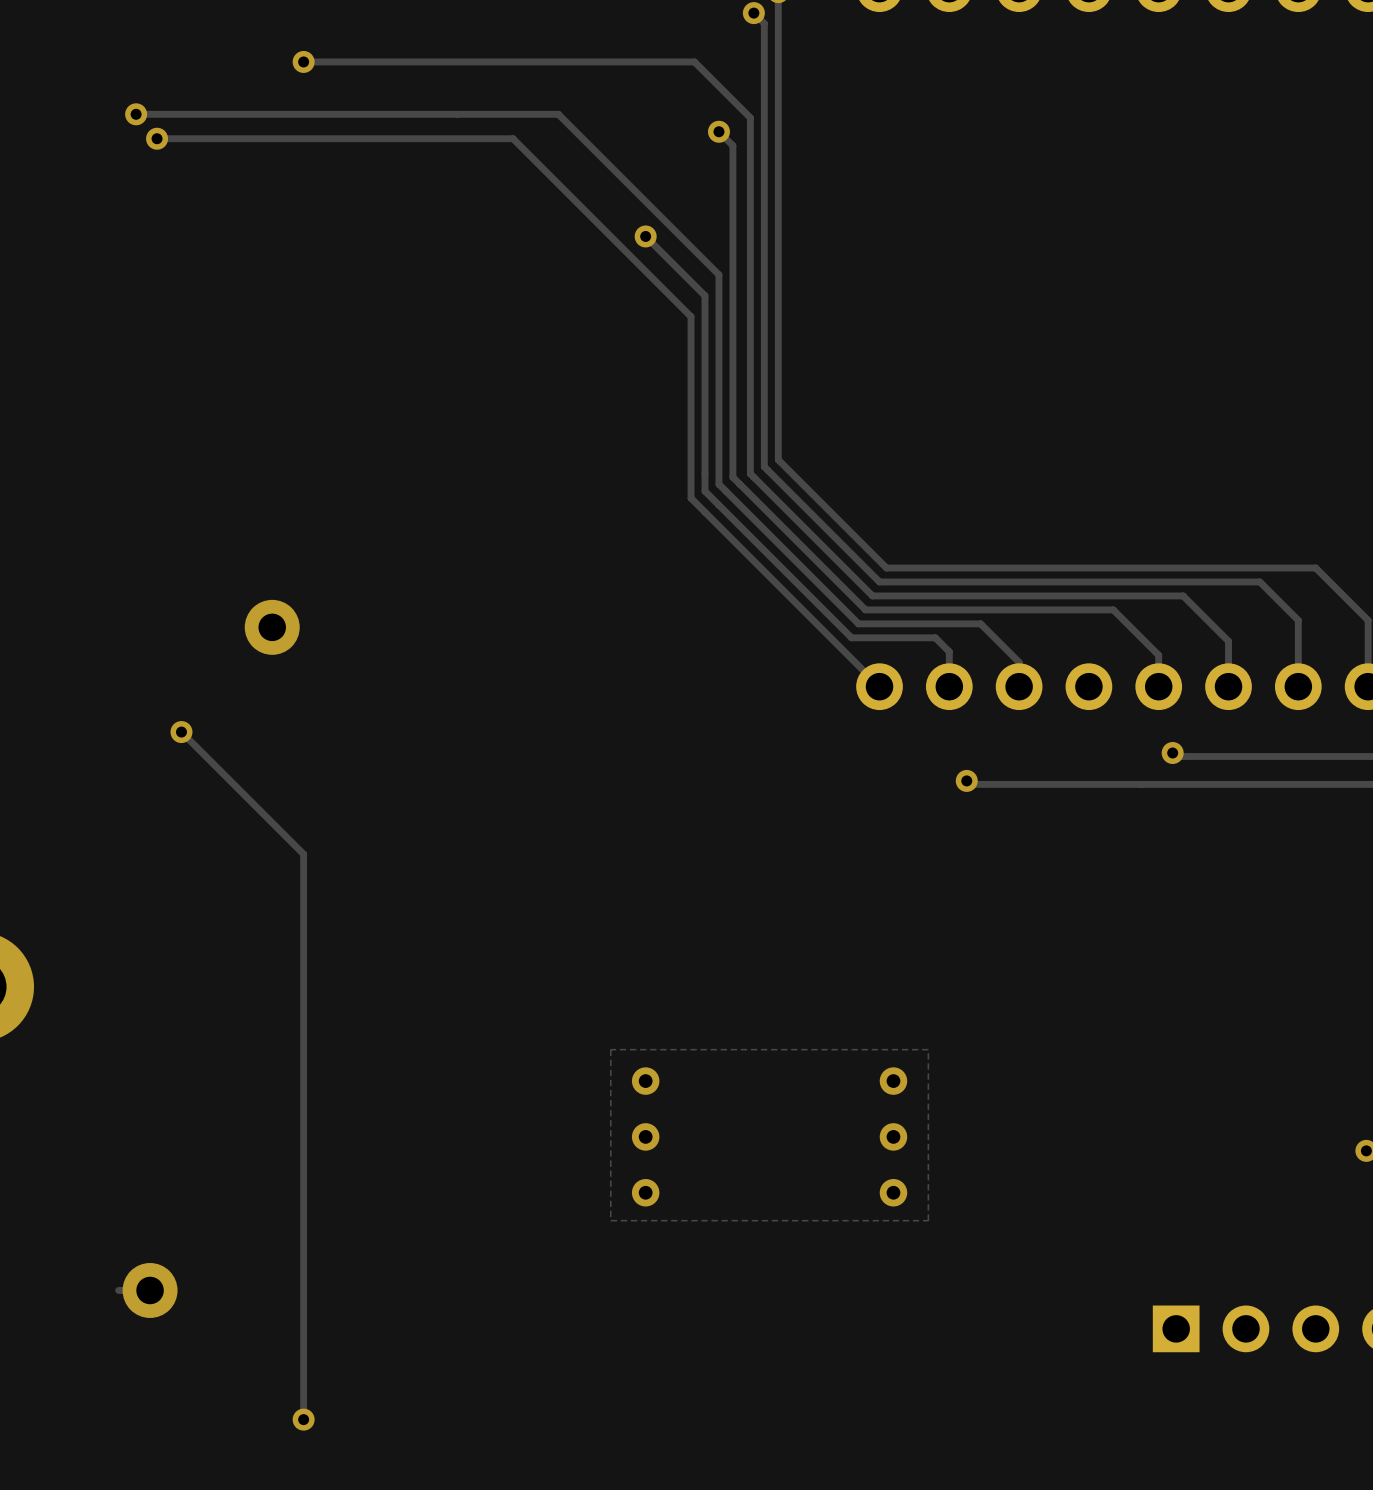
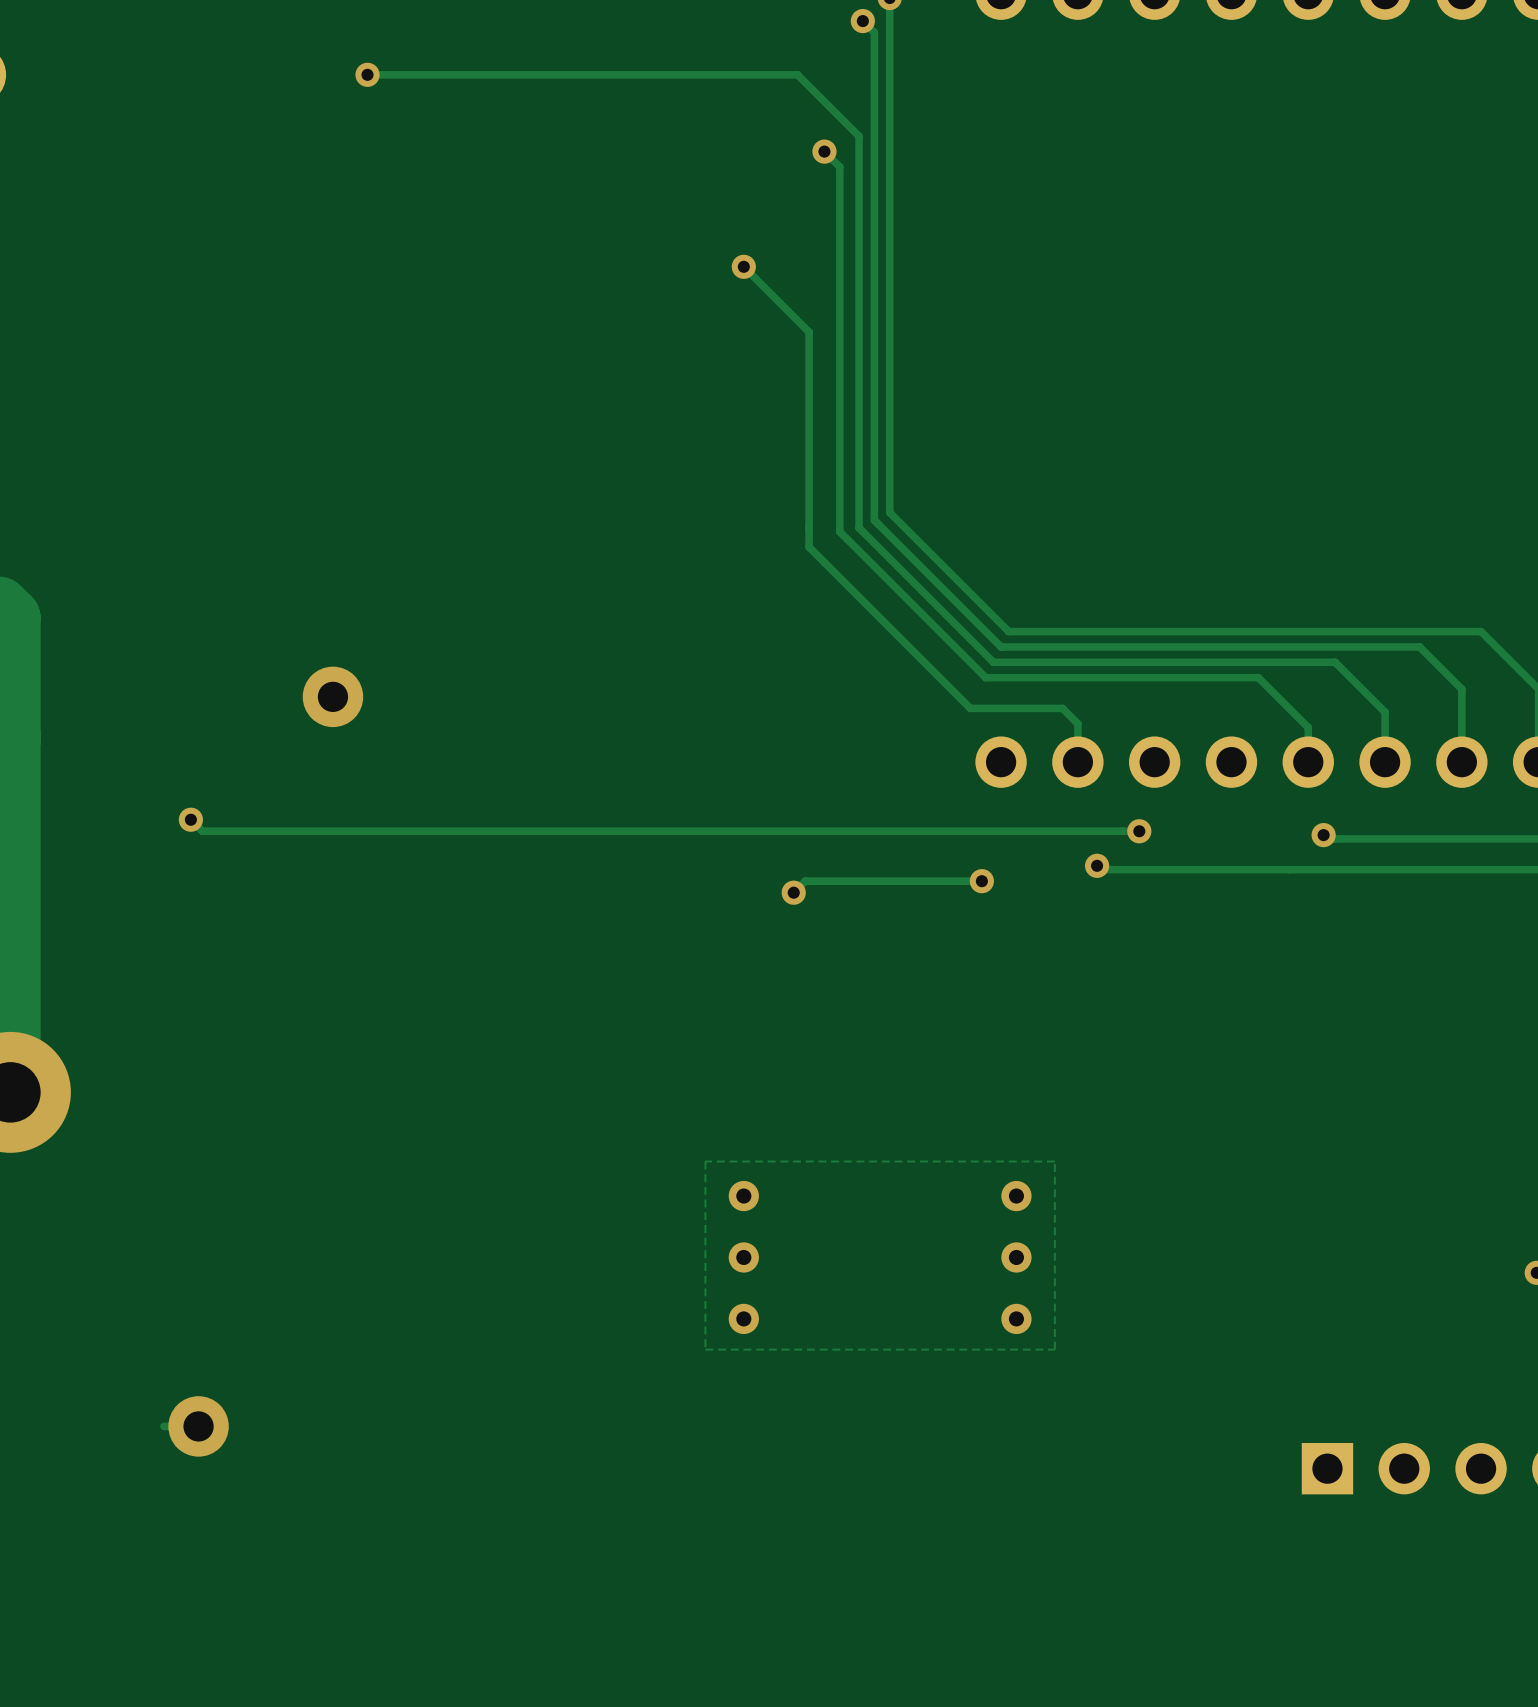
track: (136, 114) (558, 114) (718, 274) (718, 484) (858, 623) (980, 623) (1019, 662) (1019, 686) -> none
via: (136, 114) -> none
track: (157, 138) (513, 138) (691, 316) (691, 498) (879, 686) -> none
via: (157, 138) -> none
track: (181, 732) (303, 854) (303, 1419) -> none
via position: (181, 732) -> (190, 819)
track: none -> (190, 819) (202, 831) (1139, 831)
via: none -> (1139, 831)
track: none -> (981, 881) (805, 881) (793, 892)
via: none -> (981, 881)
via: none -> (793, 892)
via: (303, 1419) -> none

